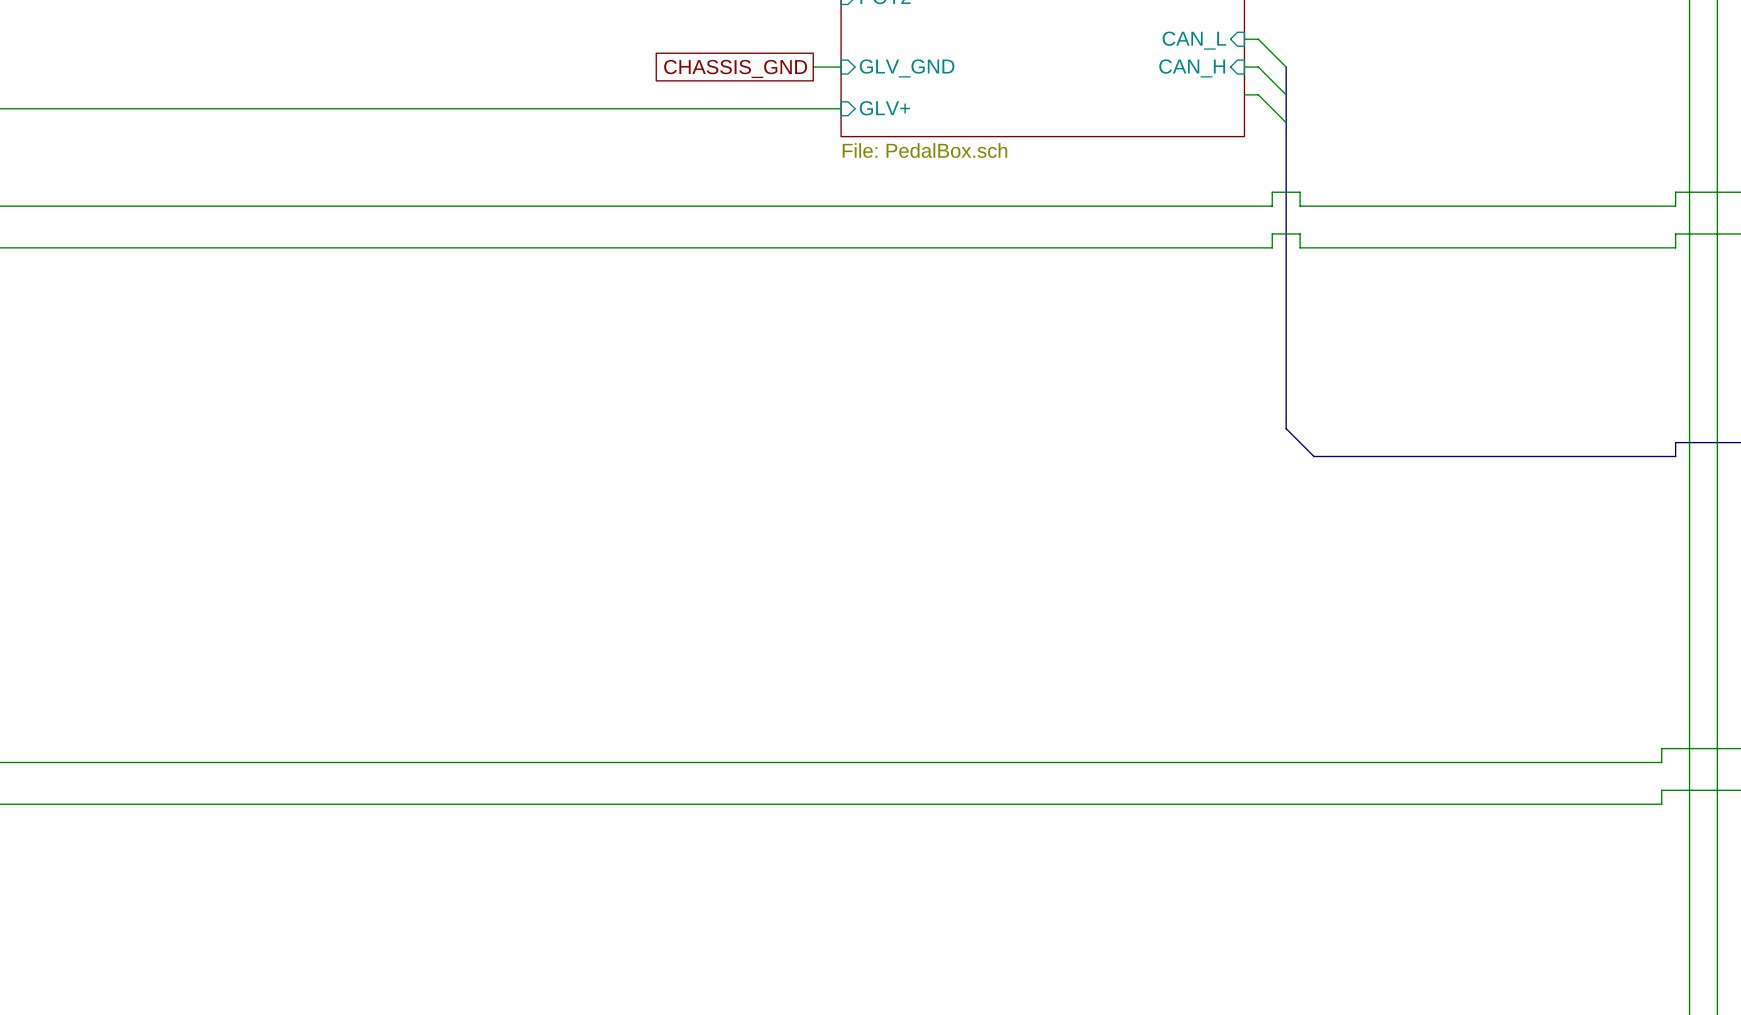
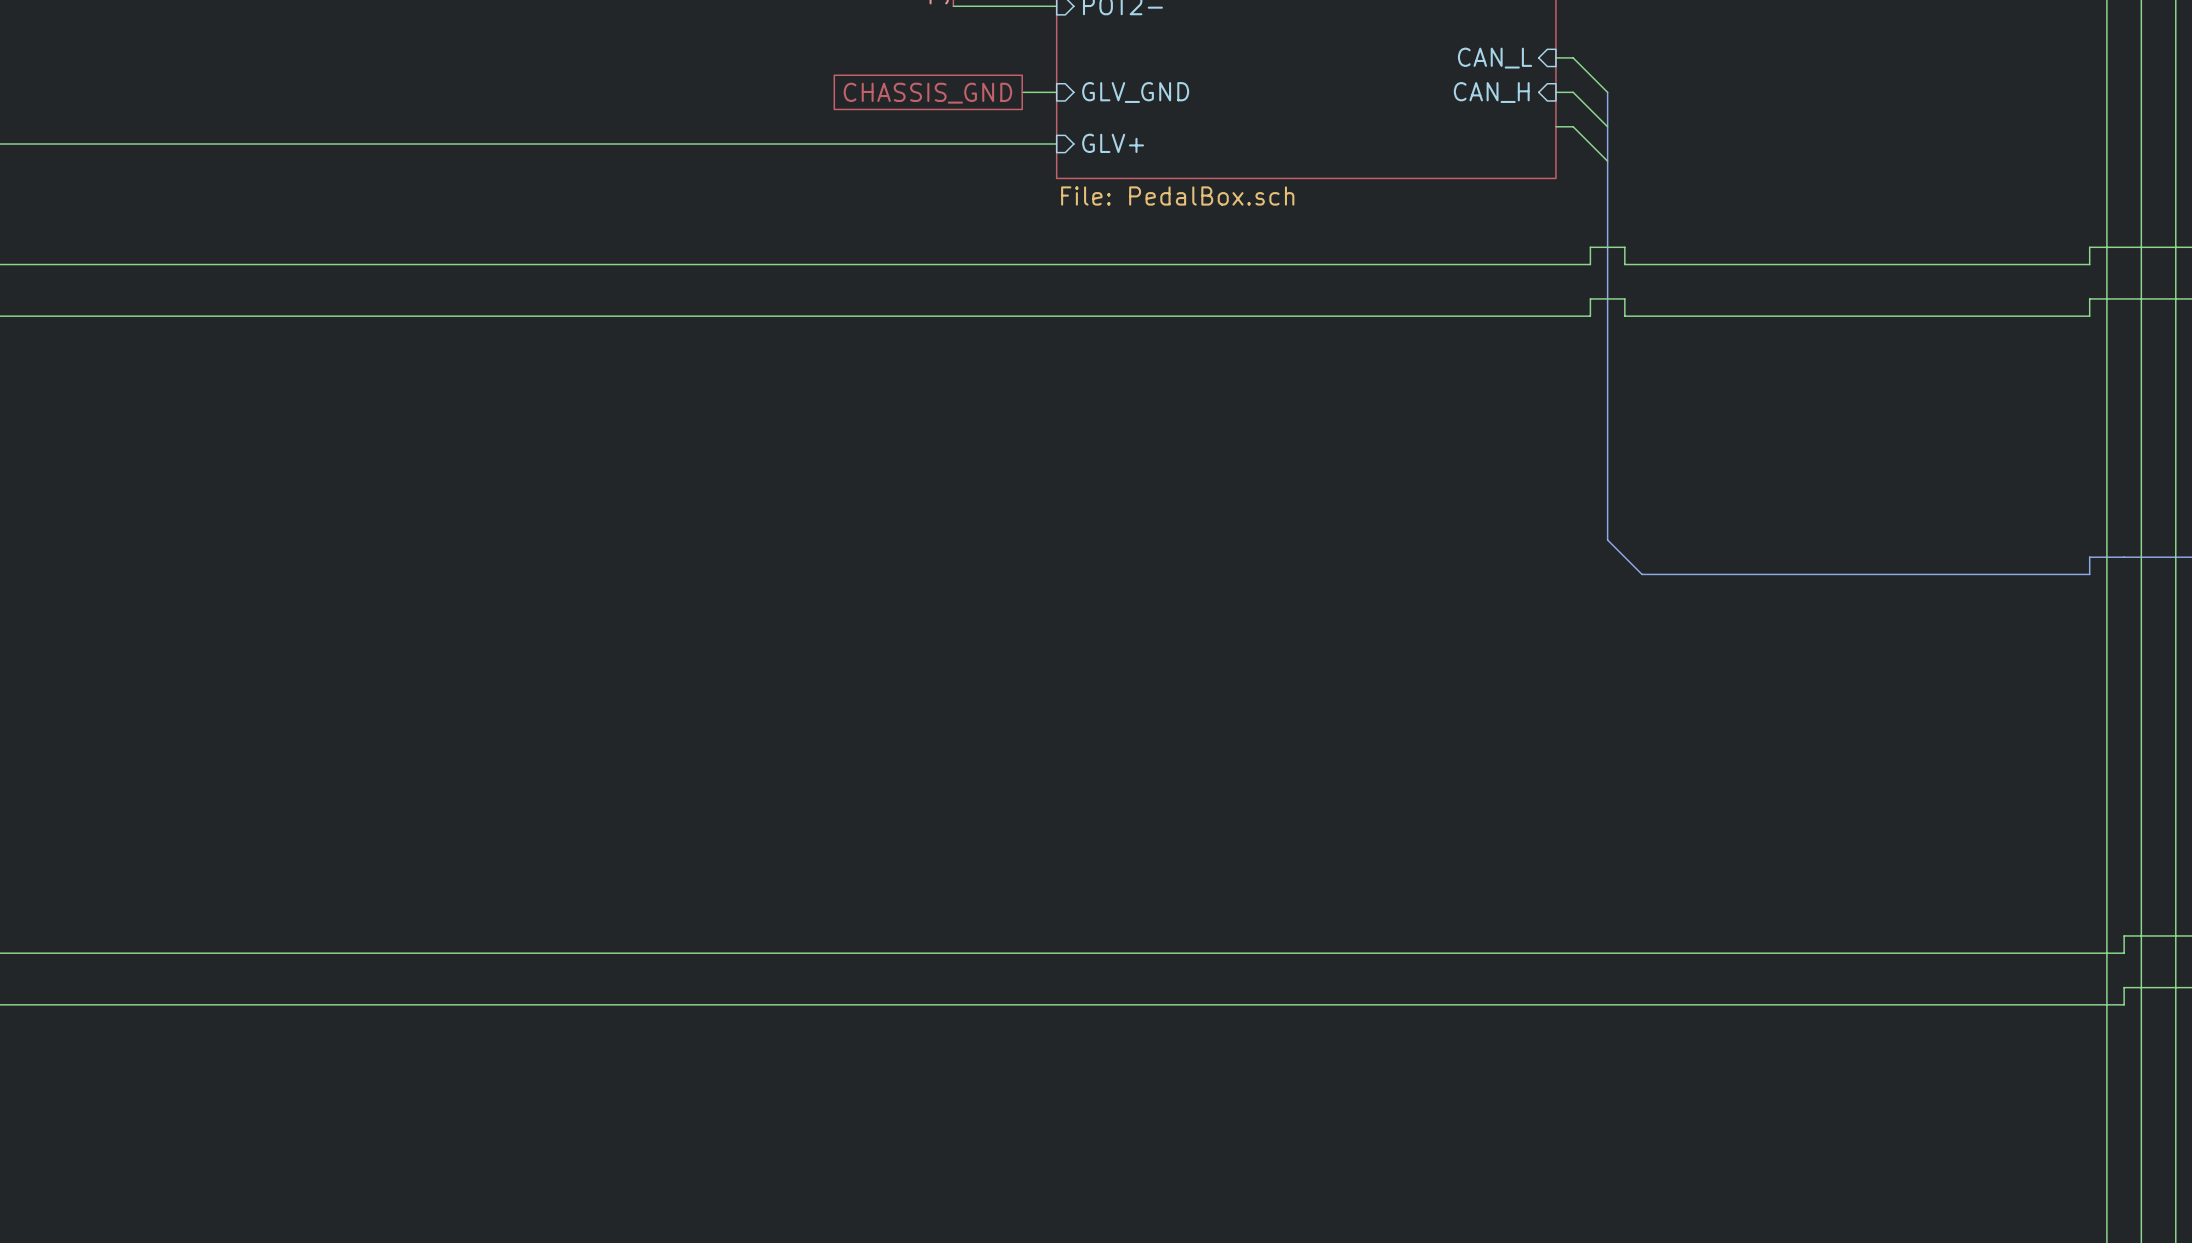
wire: (1703, 748) (1661, 748) (1661, 762) -> (2124, 935) (2124, 953) (2072, 953)
wire: (1703, 790) (1661, 790) (1661, 804) -> (2124, 987) (2124, 1004) (2072, 1004)

